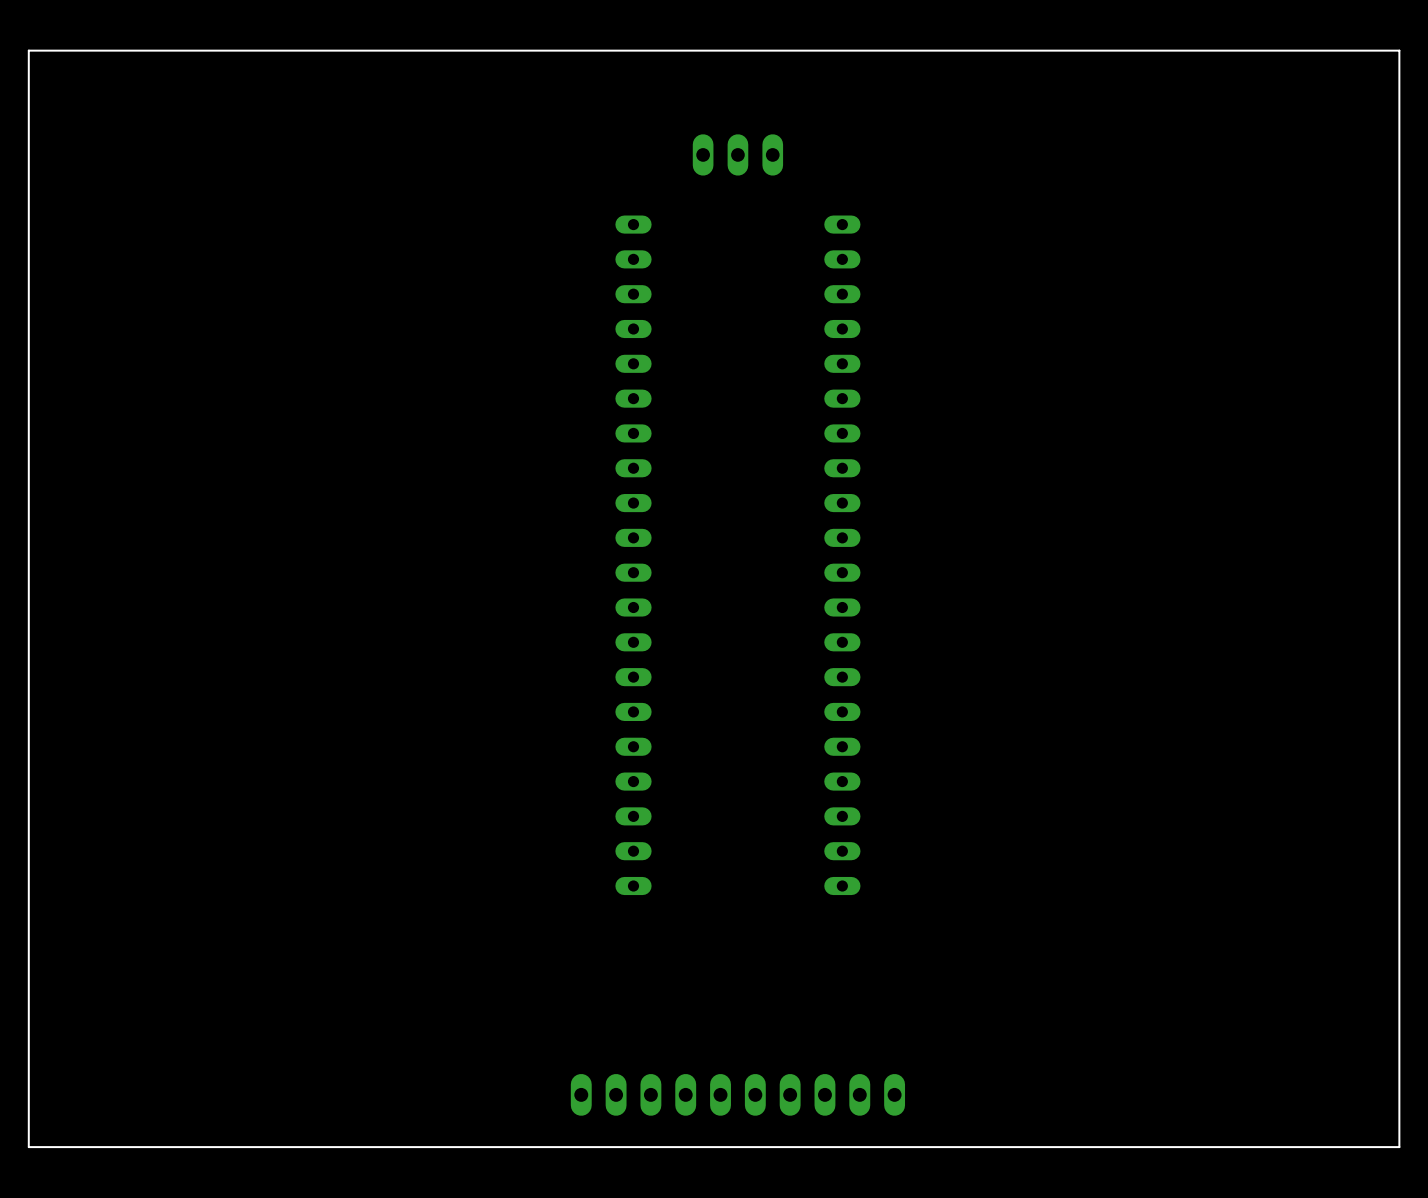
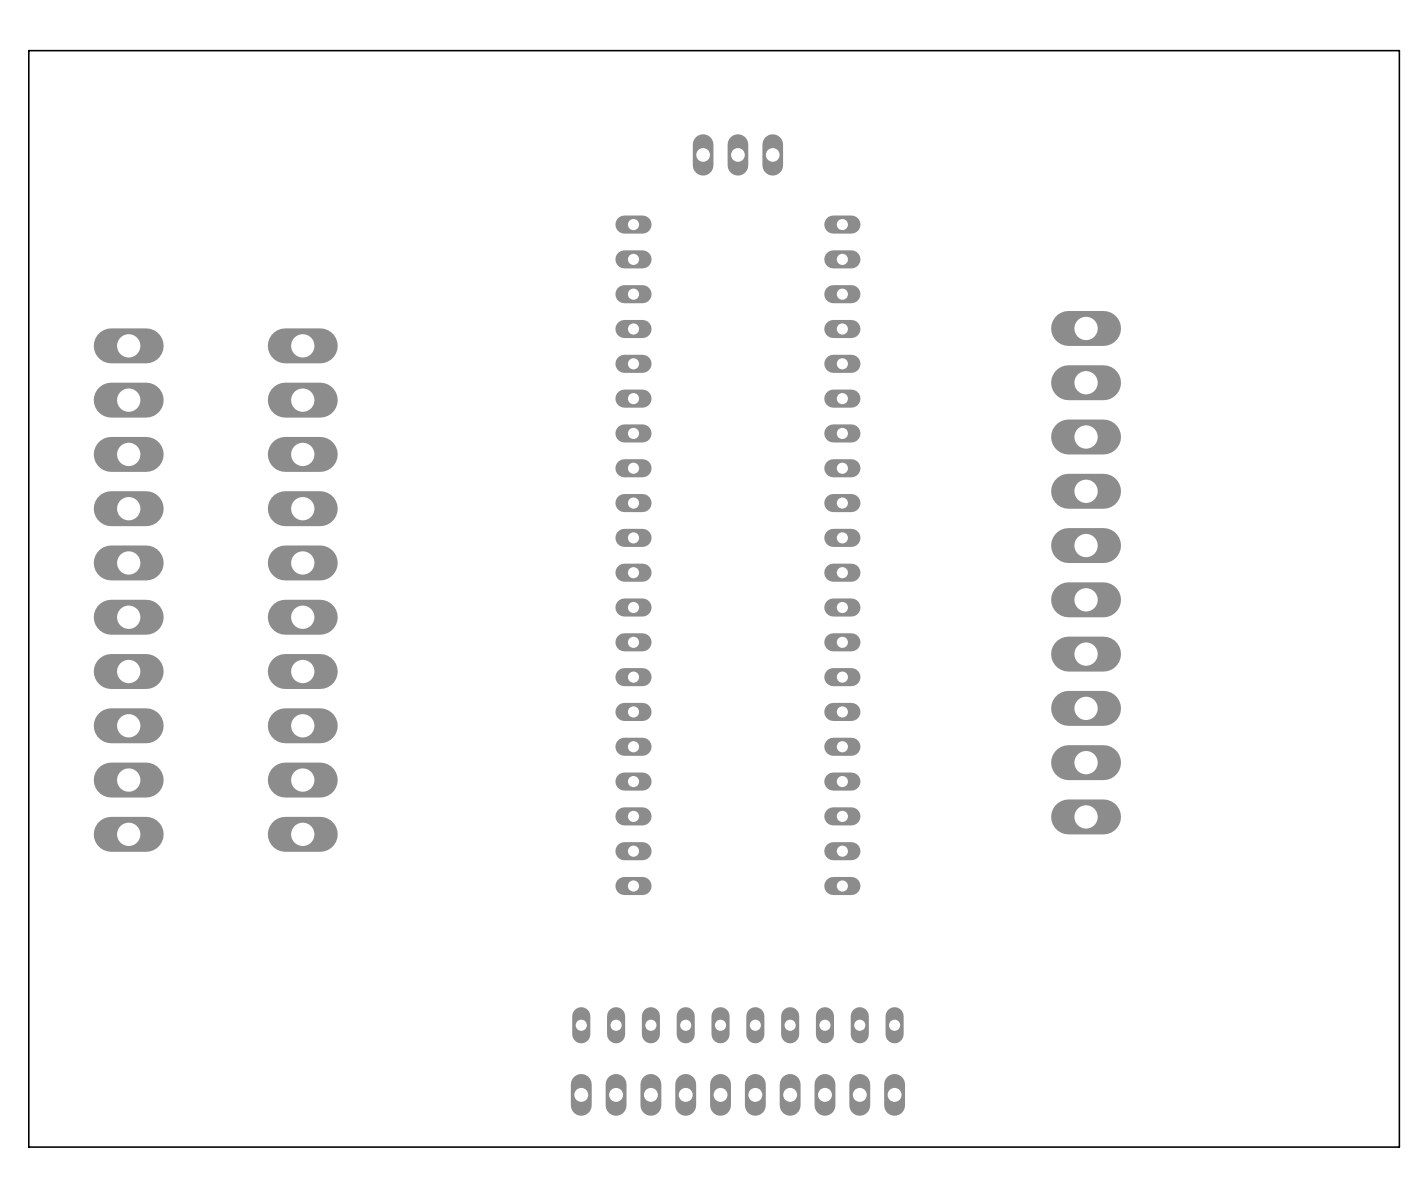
part: none -> (1086, 572)
part: none -> (128, 590)
part: none -> (302, 590)
part: none -> (737, 1025)

